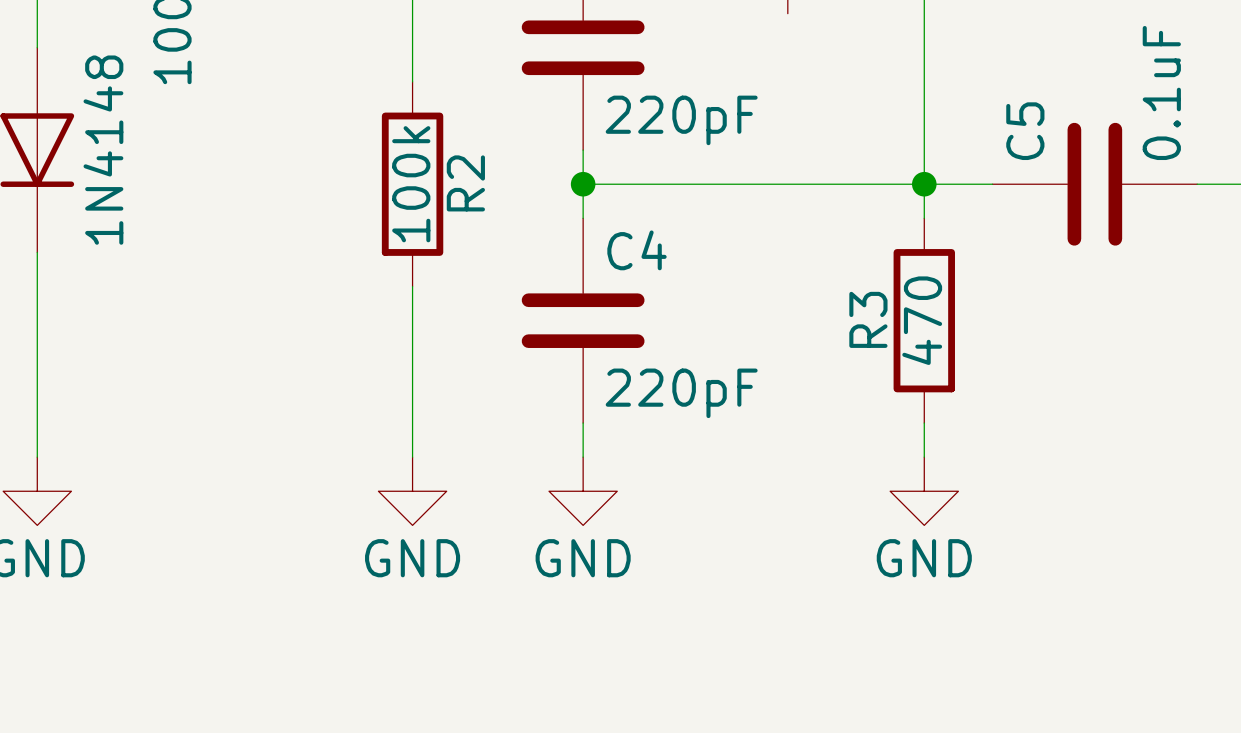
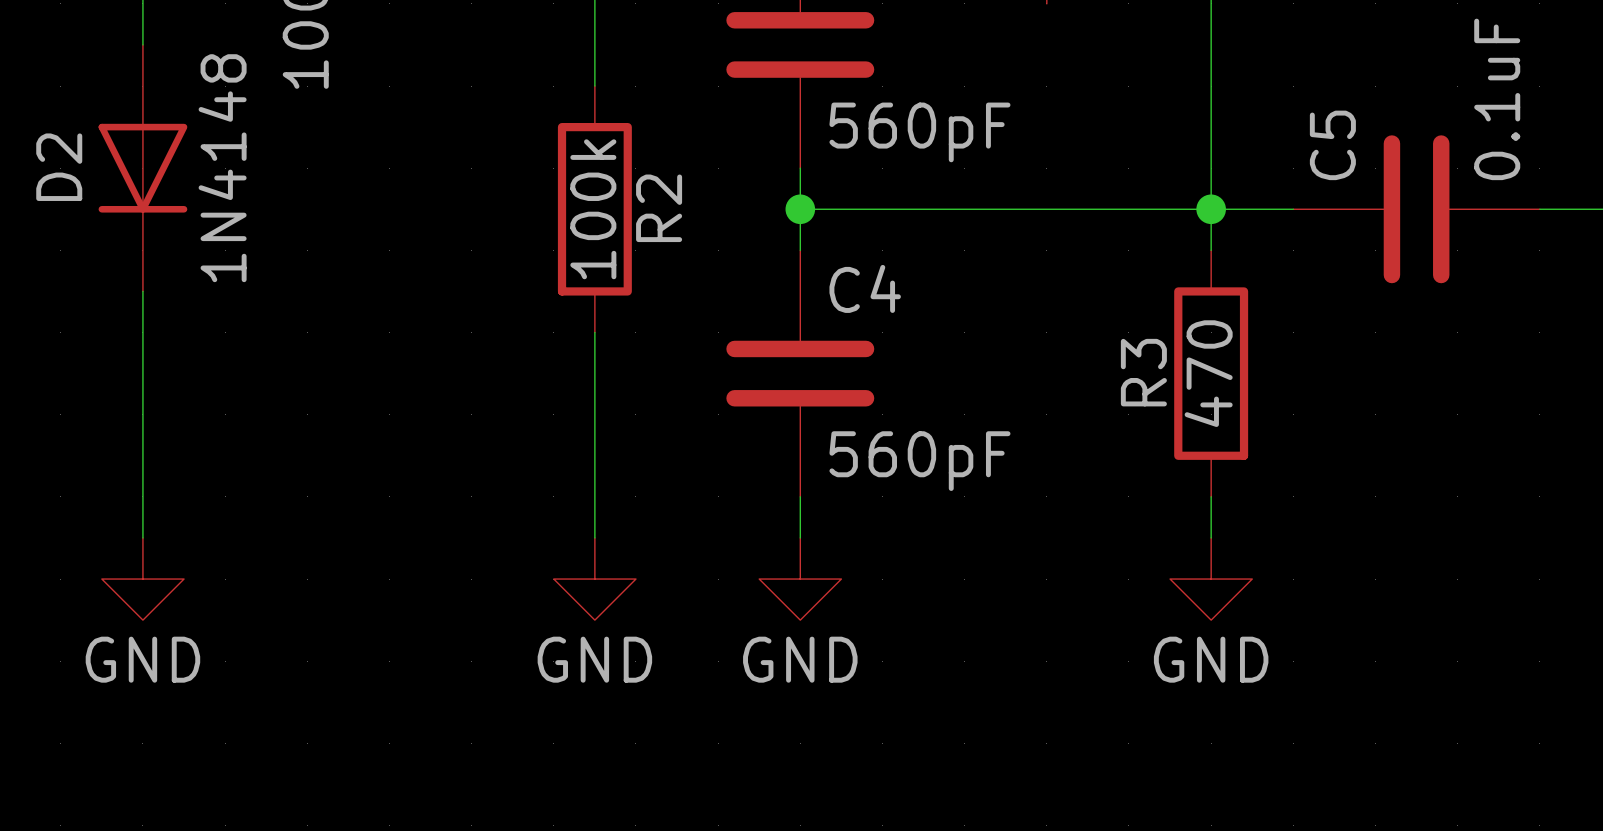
part value: 220pF (681, 120) -> 560pF (919, 132)
C4 value: 220pF (681, 393) -> 560pF (919, 461)

